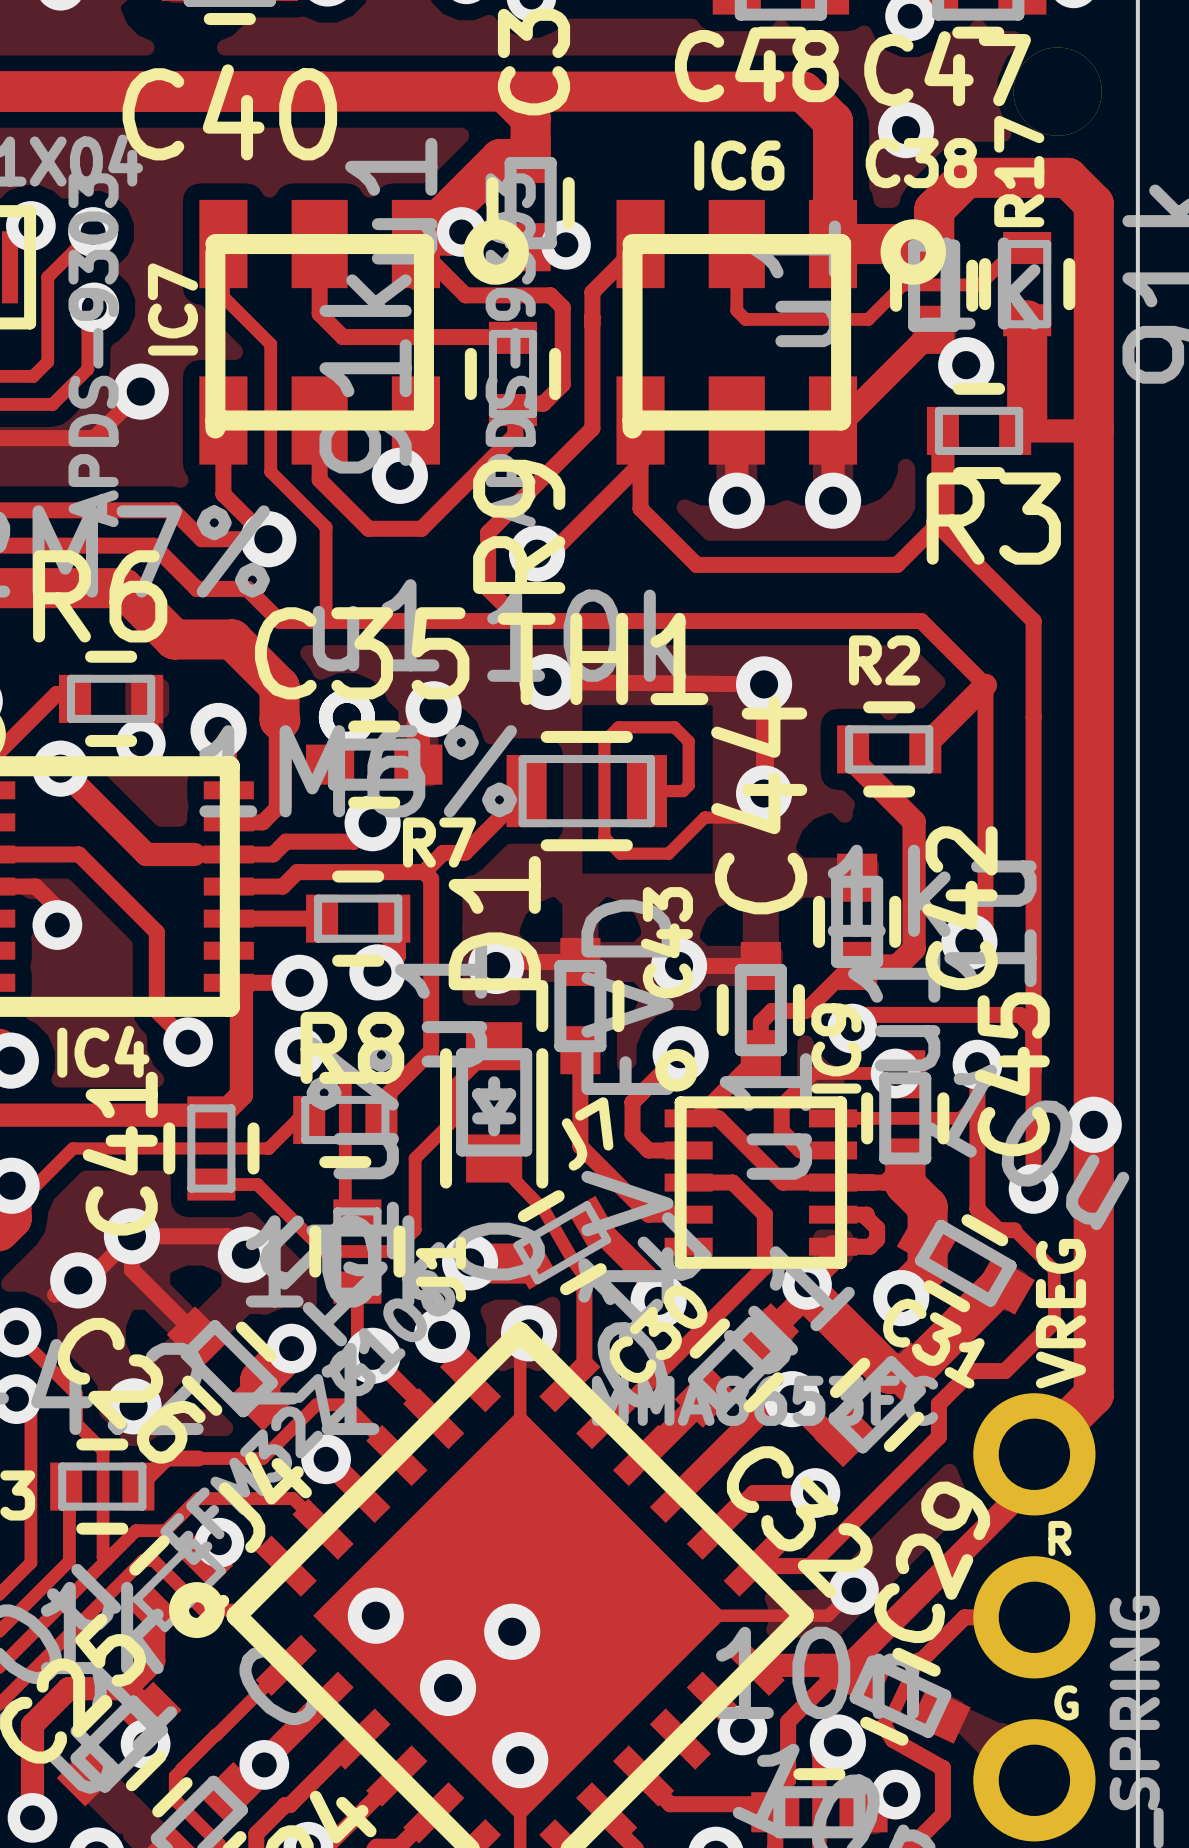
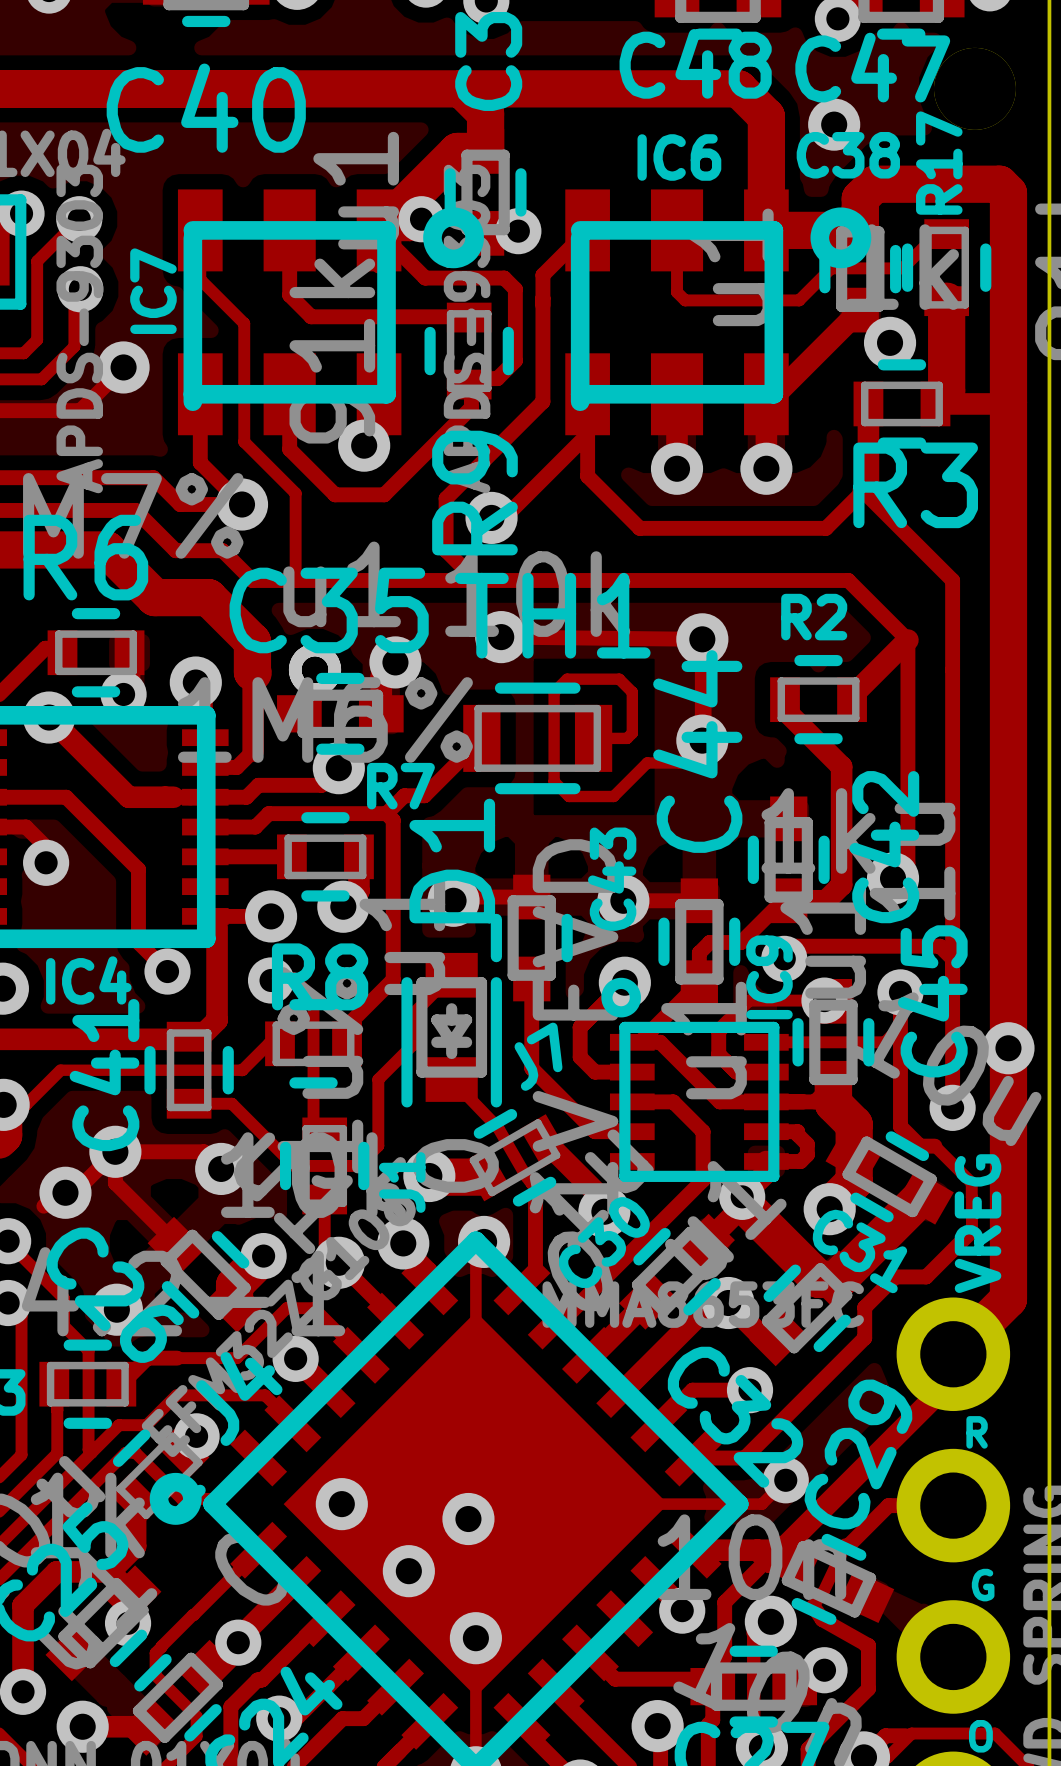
track: (949, 194) (966, 177) (1067, 177) (1084, 194) -> (874, 184) (999, 184)

